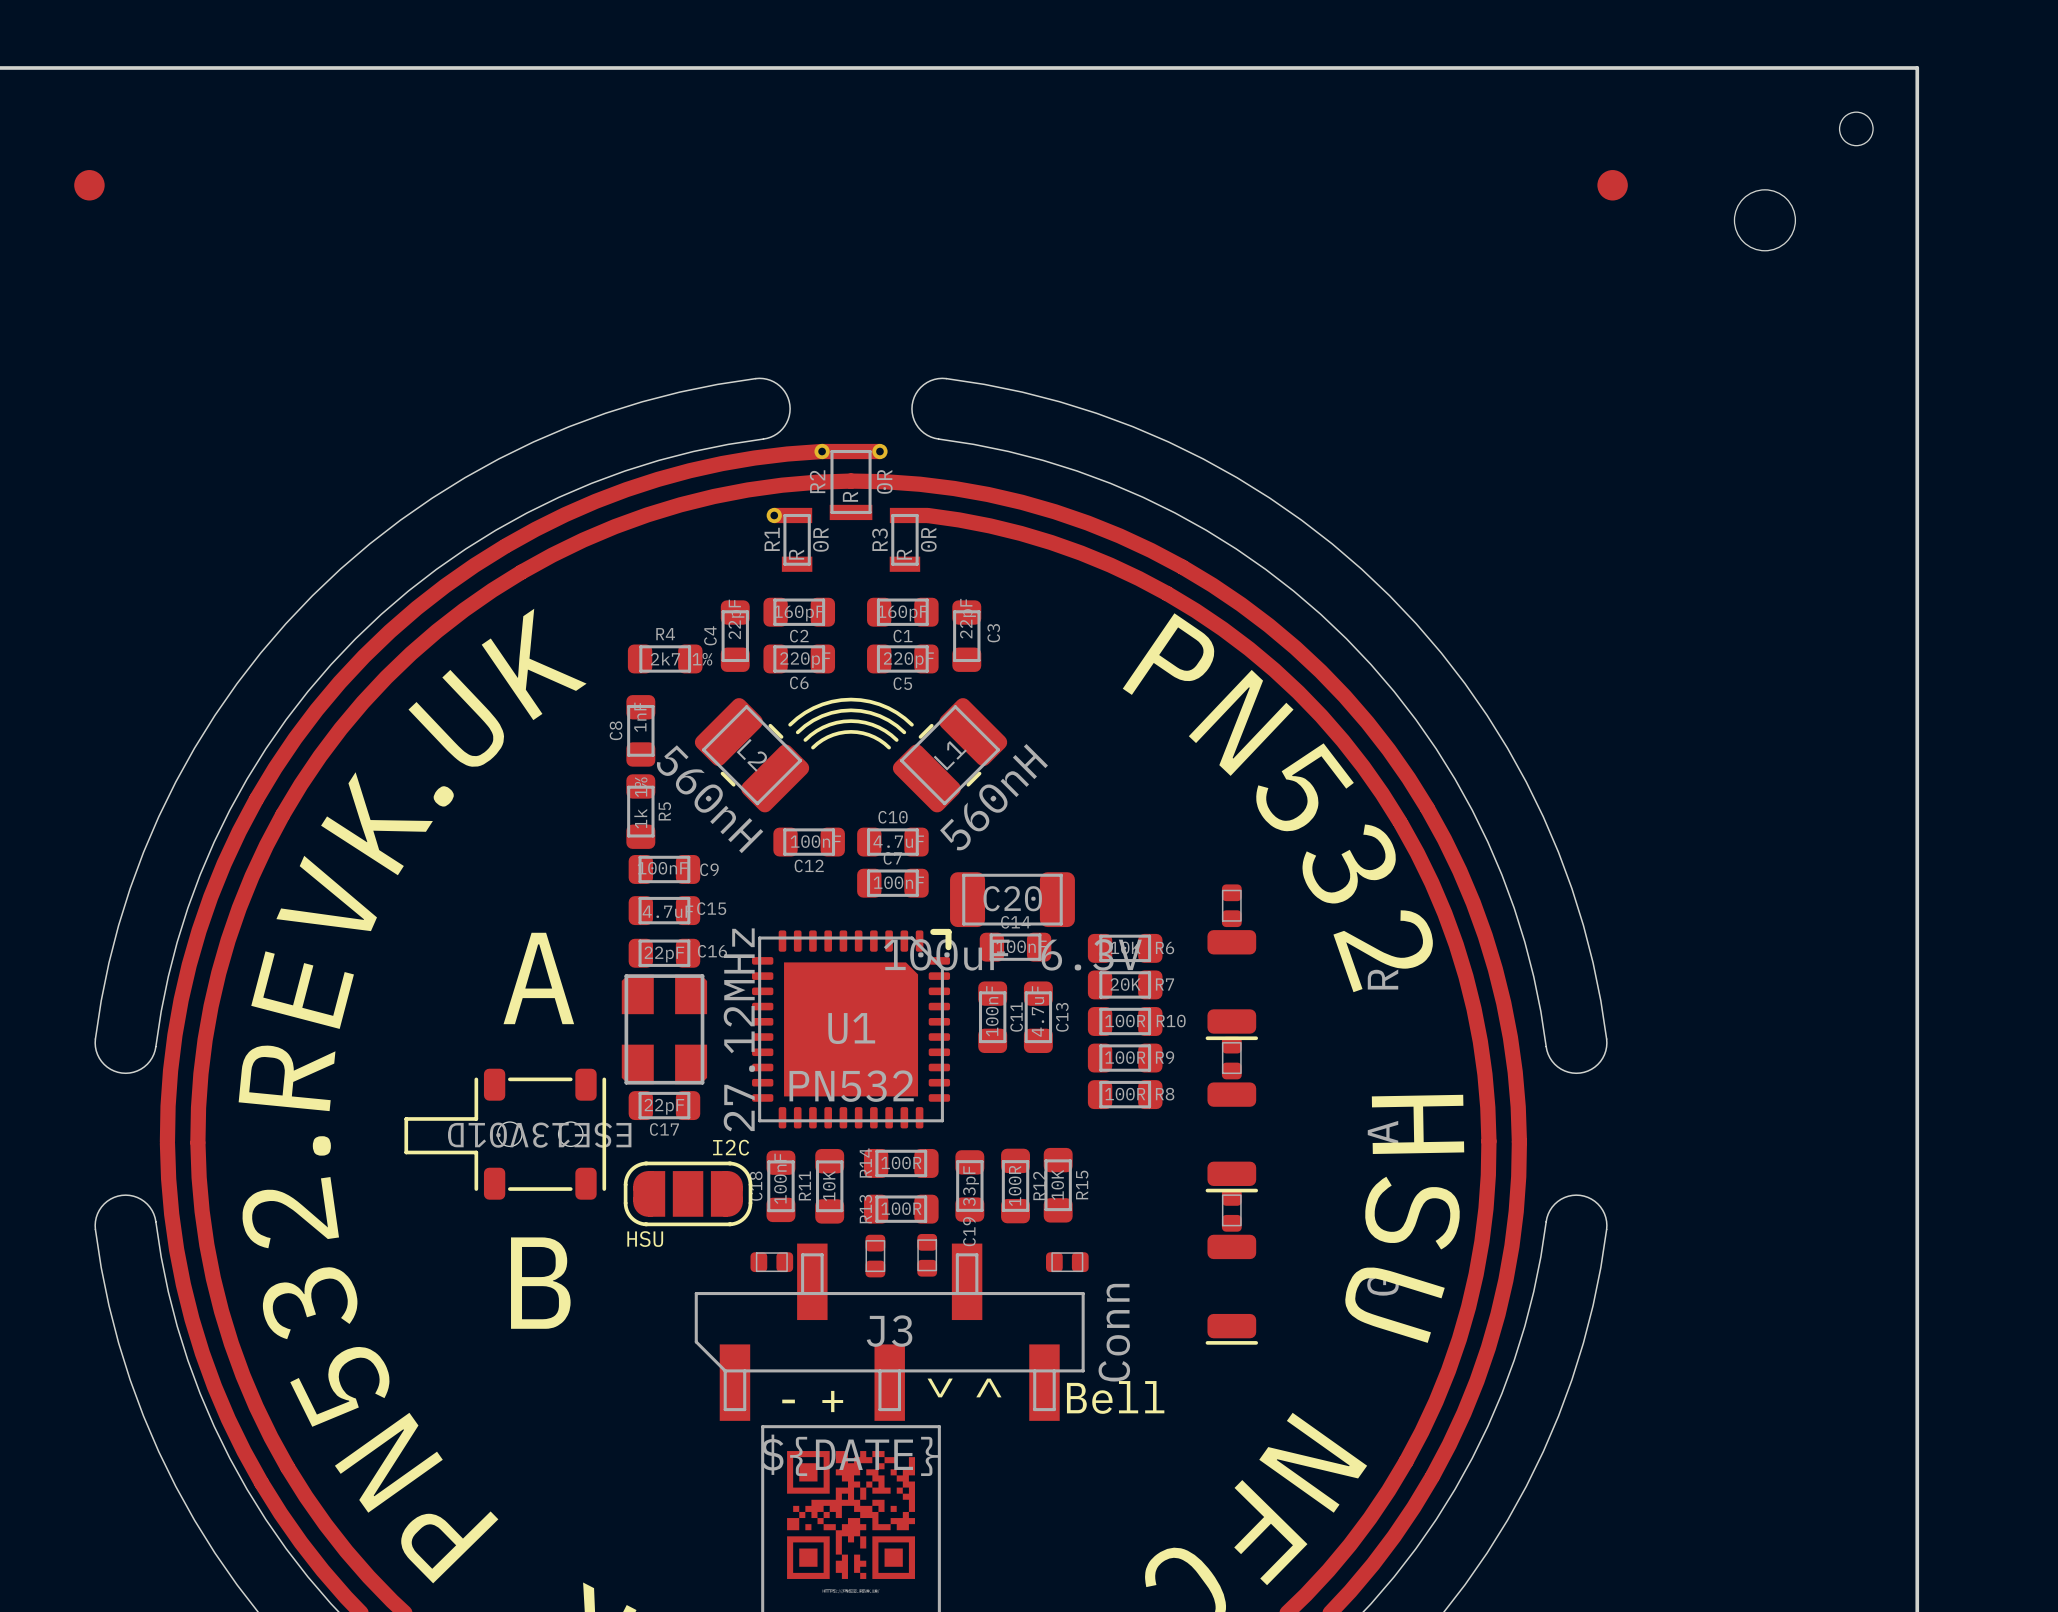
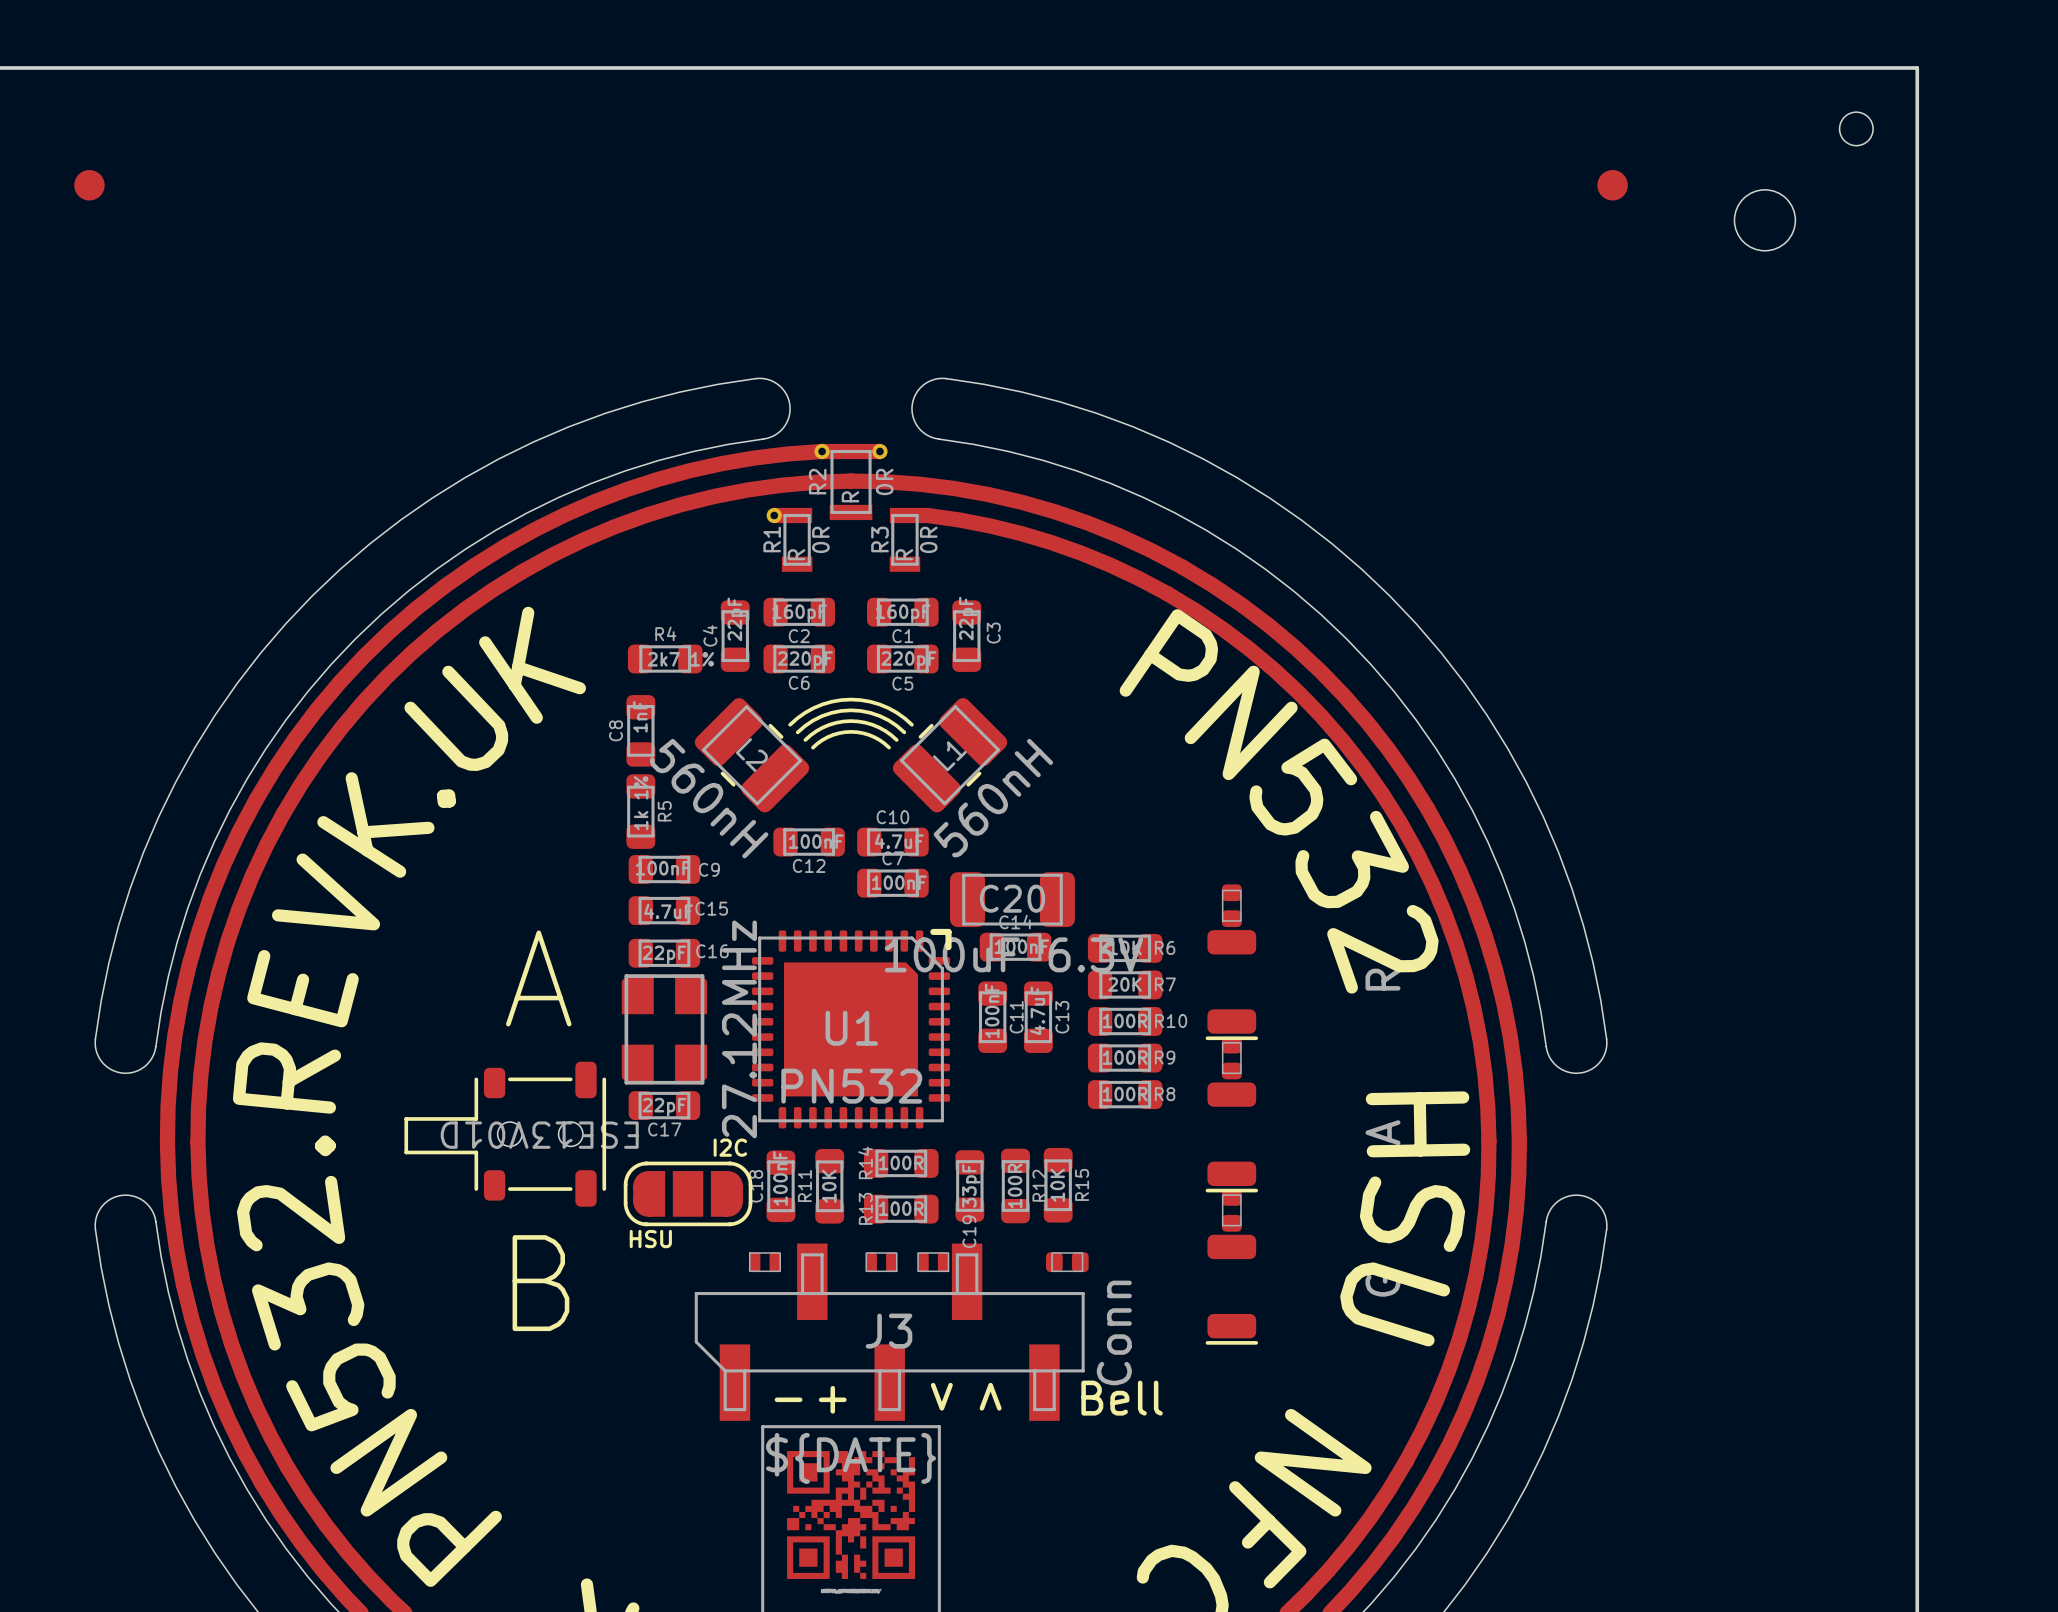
part footprint: [404, 1068, 607, 1200] -> [404, 1061, 607, 1207]
part footprint: [917, 1233, 938, 1277] -> [917, 1252, 950, 1273]
part footprint: [865, 1234, 886, 1278] -> [865, 1252, 898, 1273]
part footprint: [750, 1252, 794, 1273] -> [748, 1252, 781, 1273]

